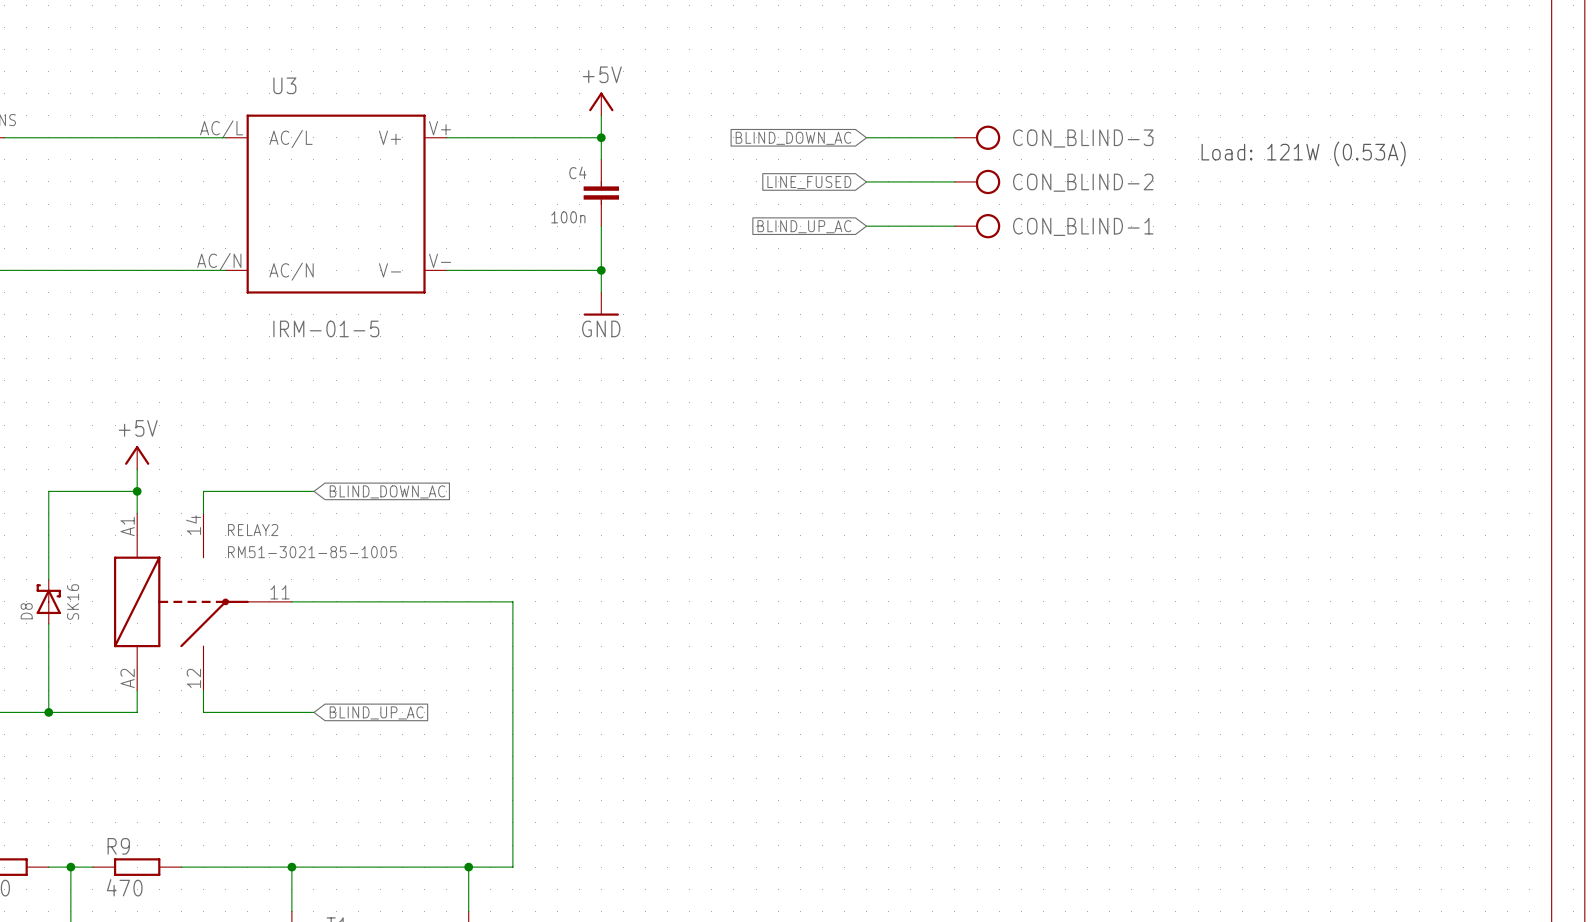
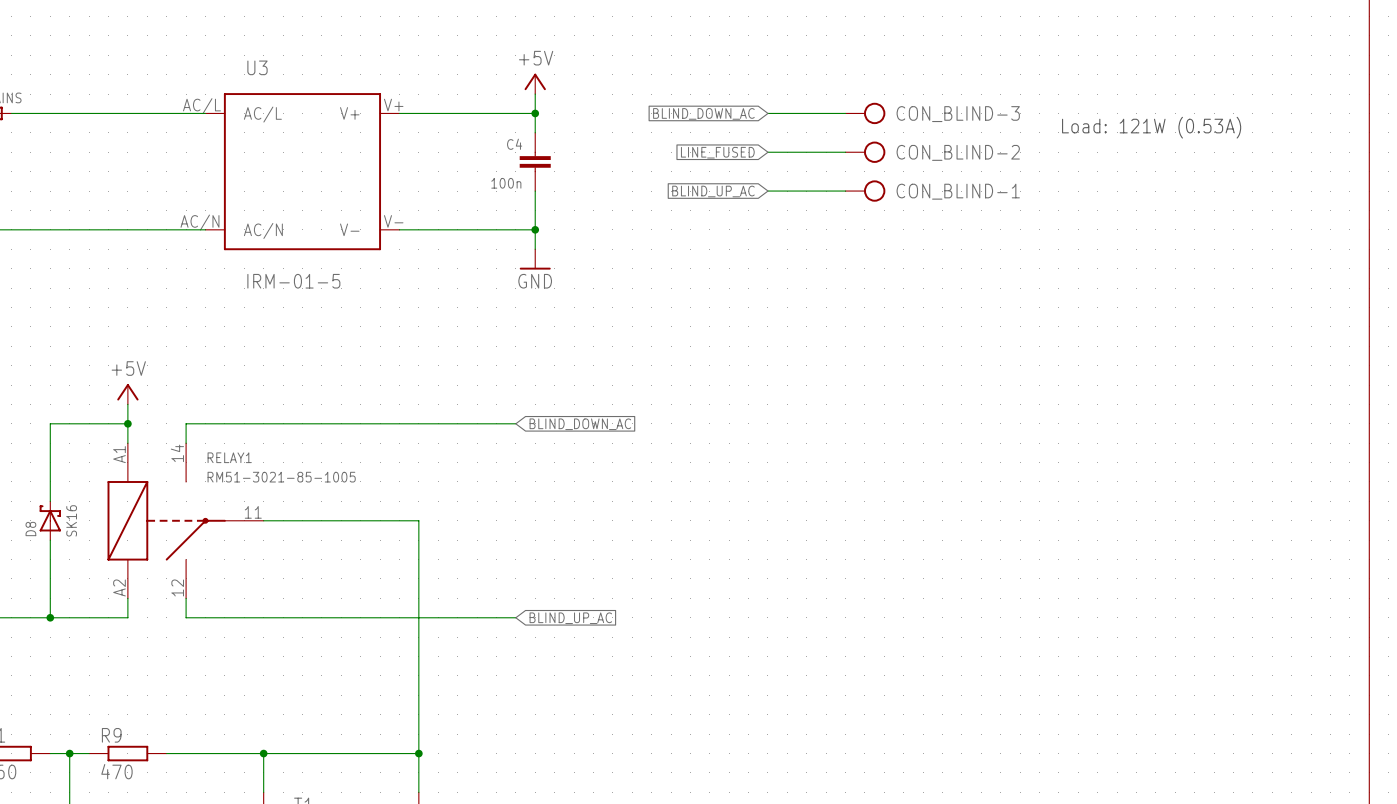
wire: none -> (283, 423) (515, 423)
global label: BLIND_DOWN_AC (387, 491) -> none
global label: none -> BLIND_DOWN_AC (580, 424)
RELAY2 name: RELAY2 (253, 530) -> RELAY1 (229, 457)
wire: (468, 601) (512, 601) (512, 867) (468, 867) -> (418, 520) (418, 753)
wire: none -> (283, 617) (515, 617)
global label: BLIND_UP_AC (376, 712) -> none
global label: none -> BLIND_UP_AC (570, 618)

